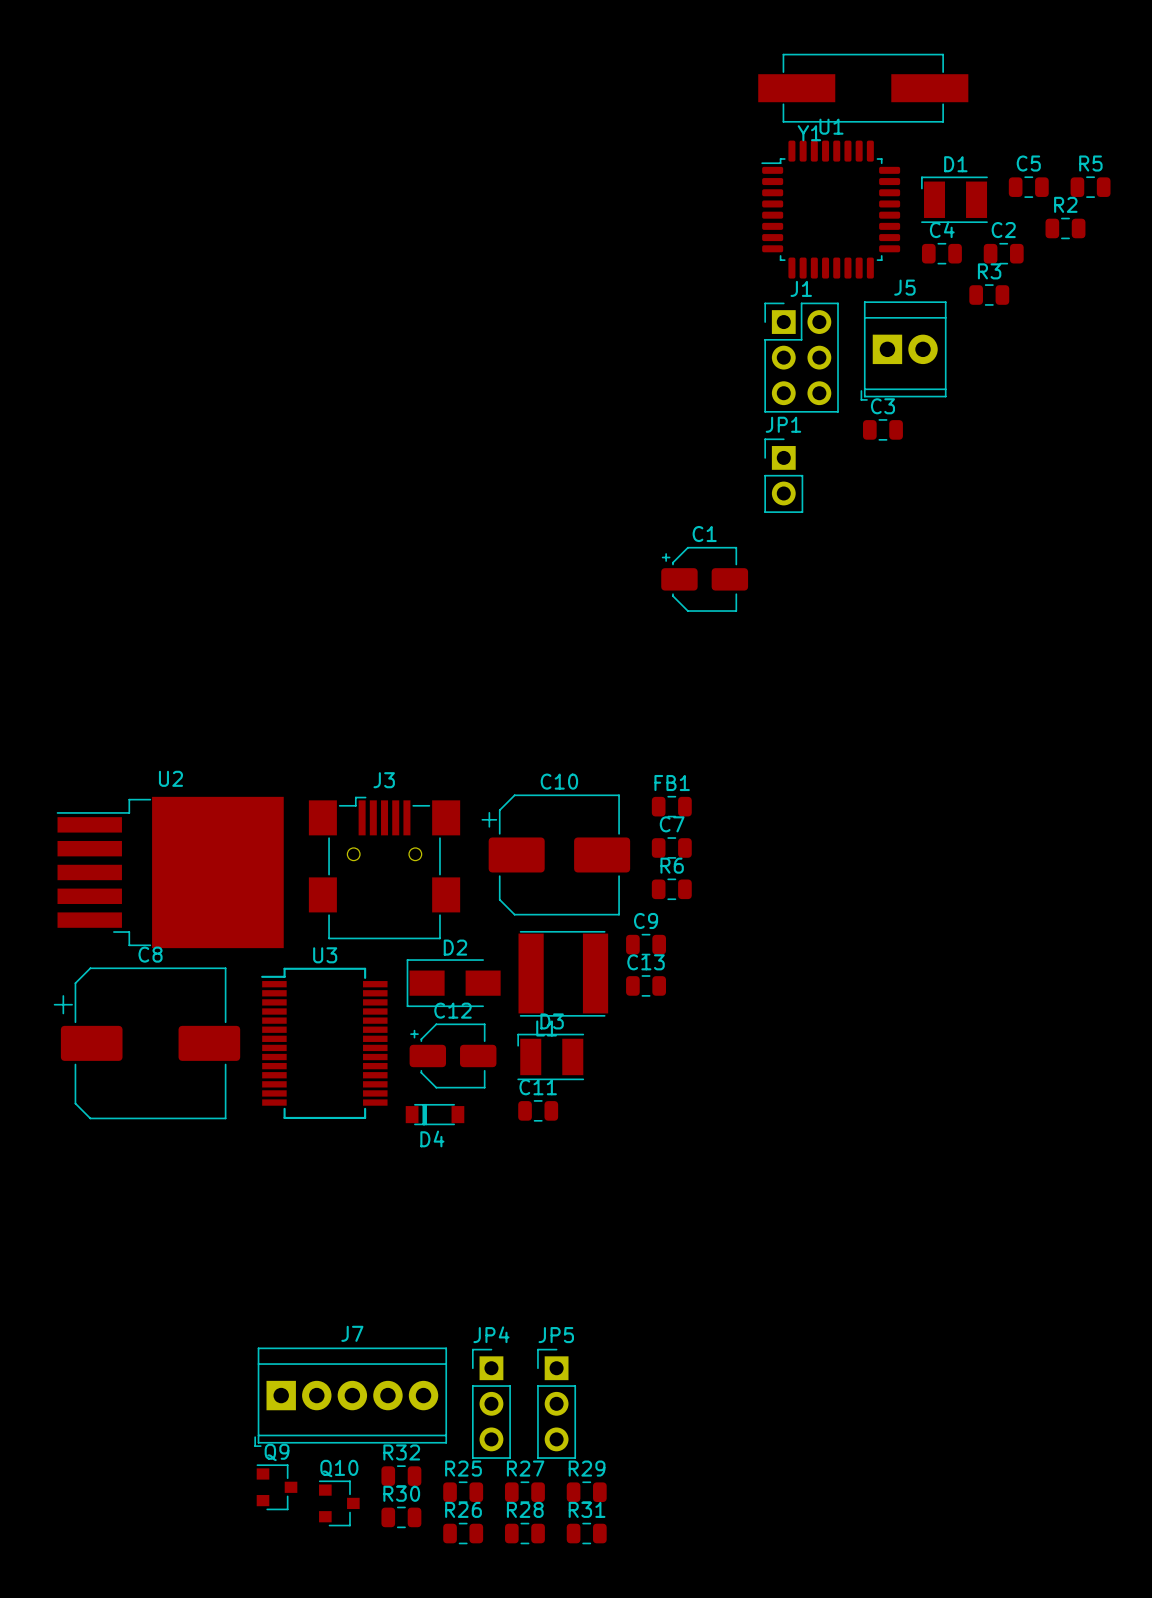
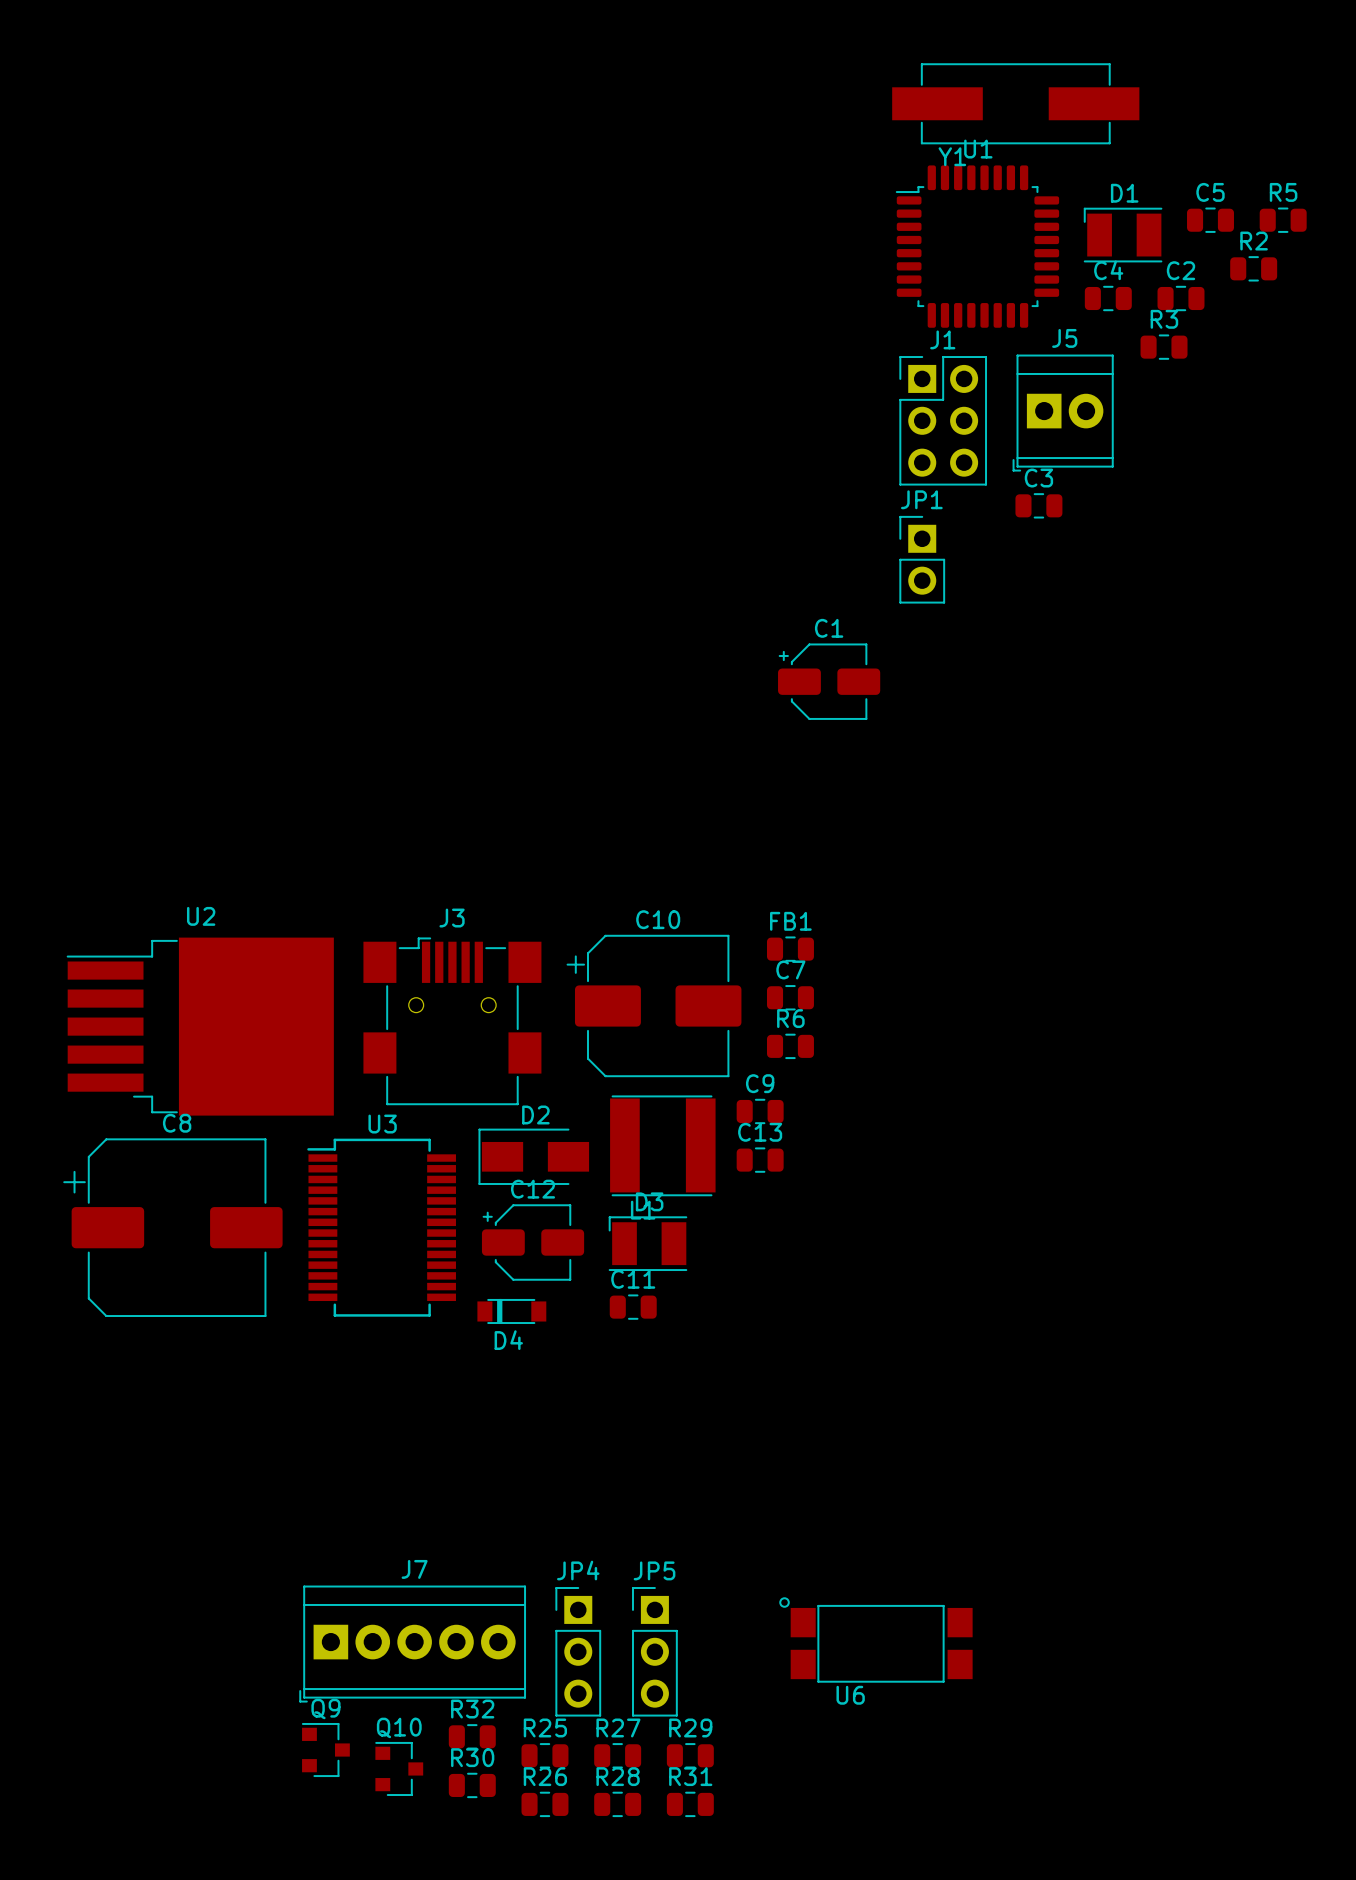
U6: none -> (875, 1639)

